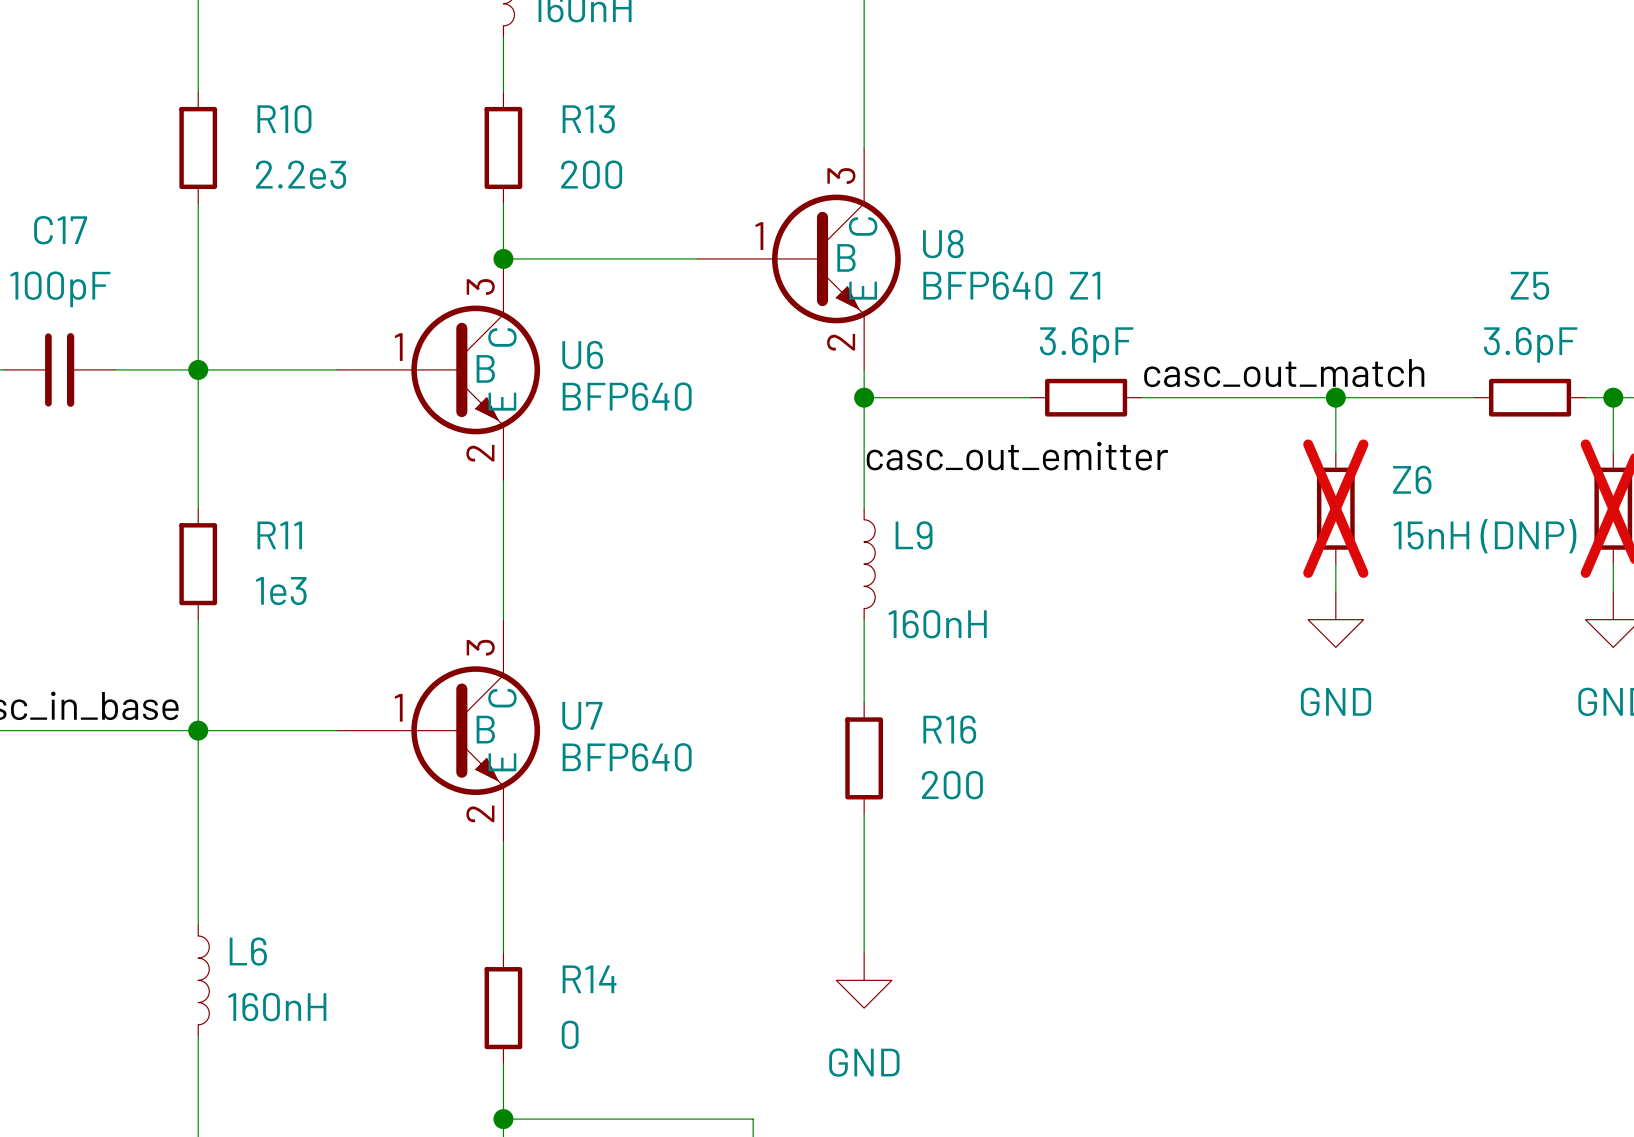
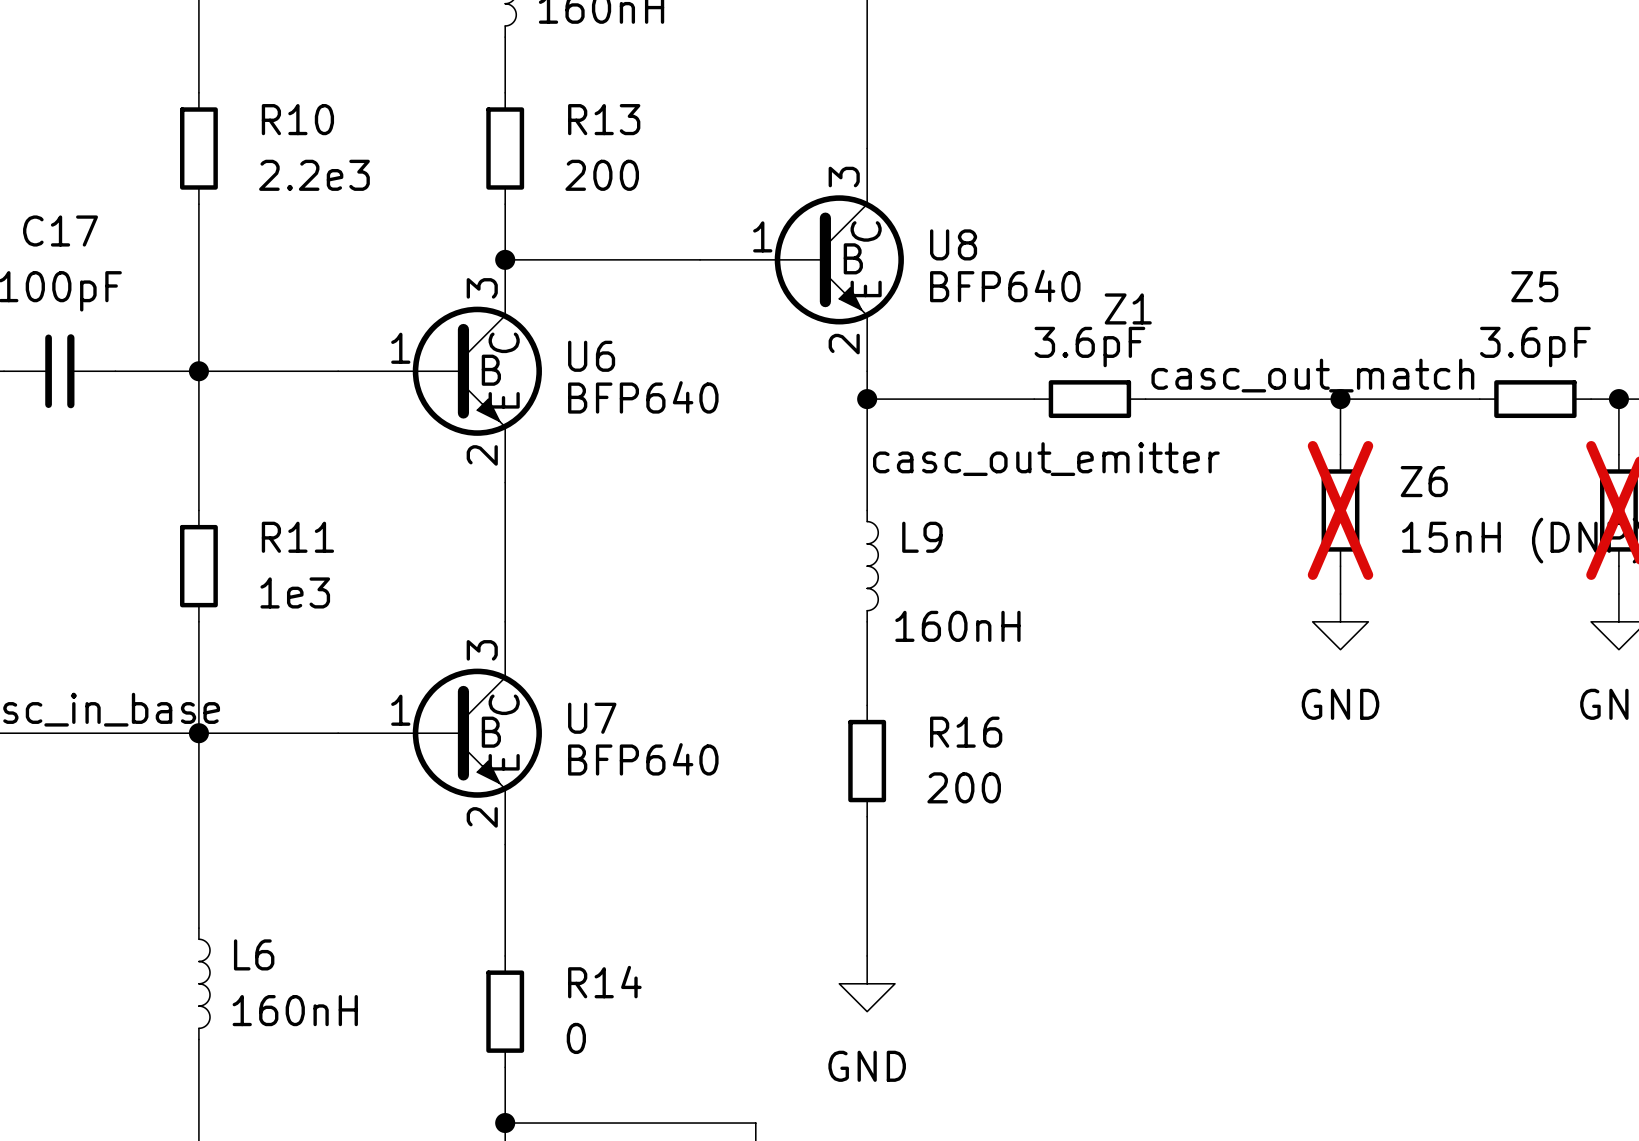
Z1 name position: Z1 (1085, 285) -> Z1 (1128, 308)

